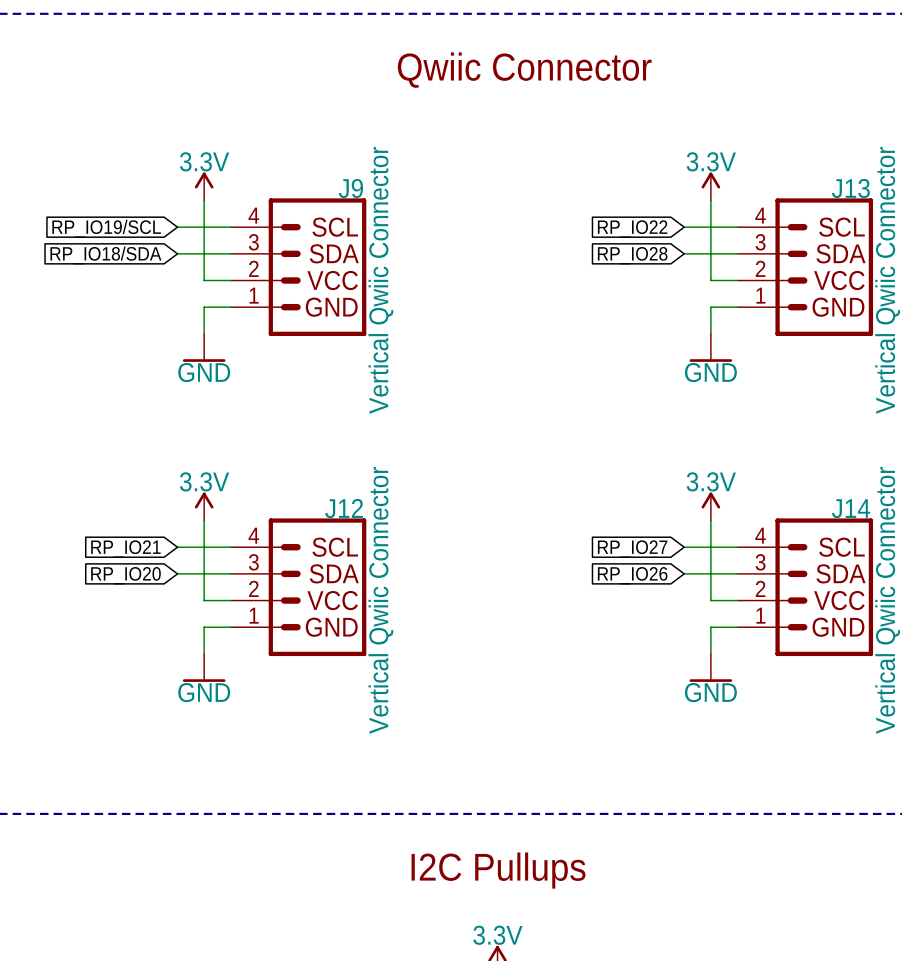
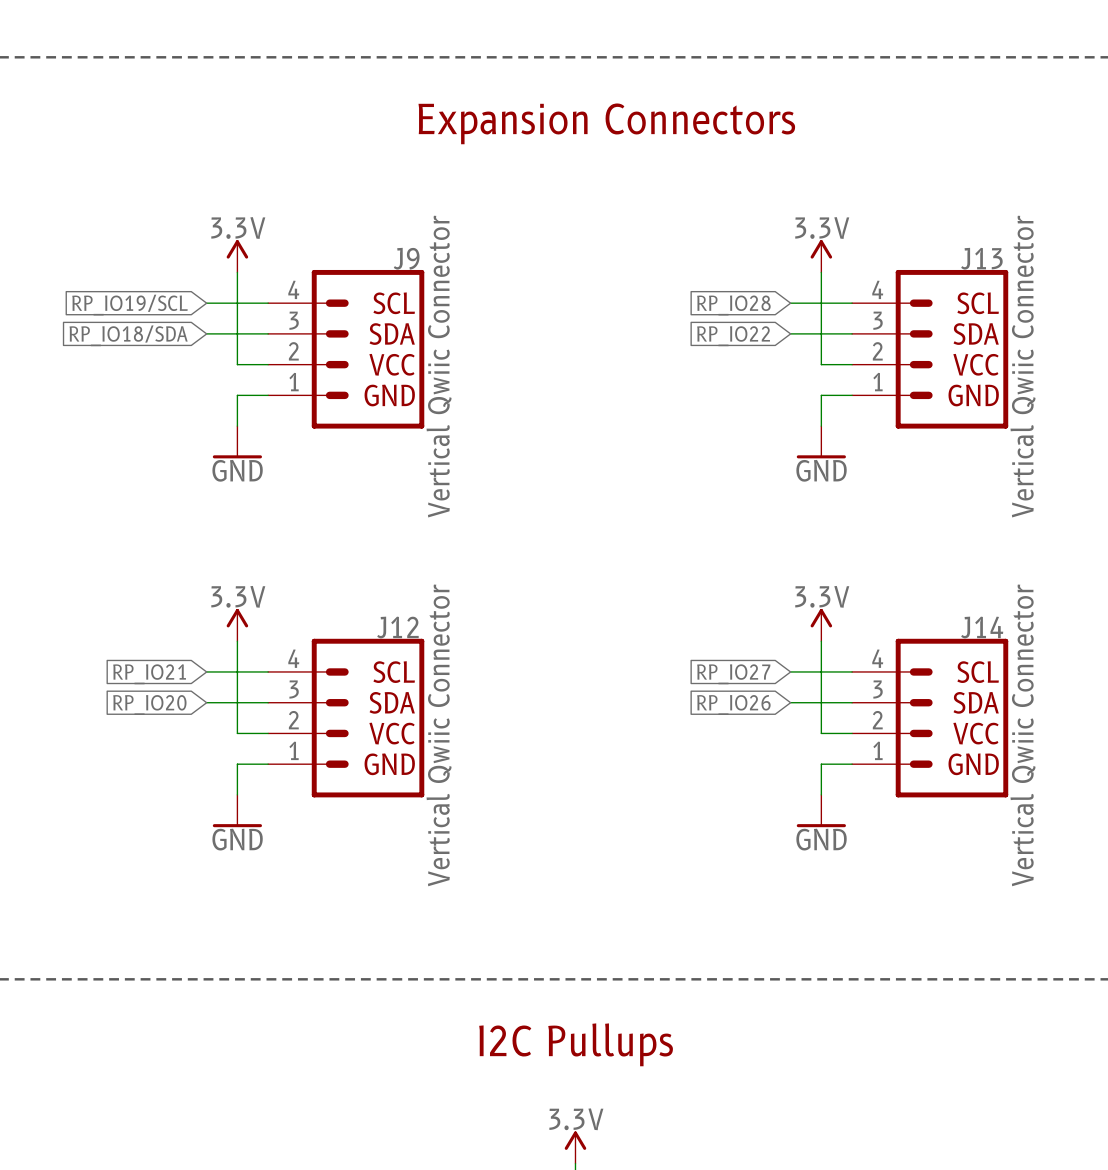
text: Qwiic Connector (524, 70) -> Expansion Connectors (606, 123)
global label: RP_IO22 (632, 229) -> RP_IO28 (733, 305)
global label: RP_IO28 (632, 255) -> RP_IO22 (733, 336)

